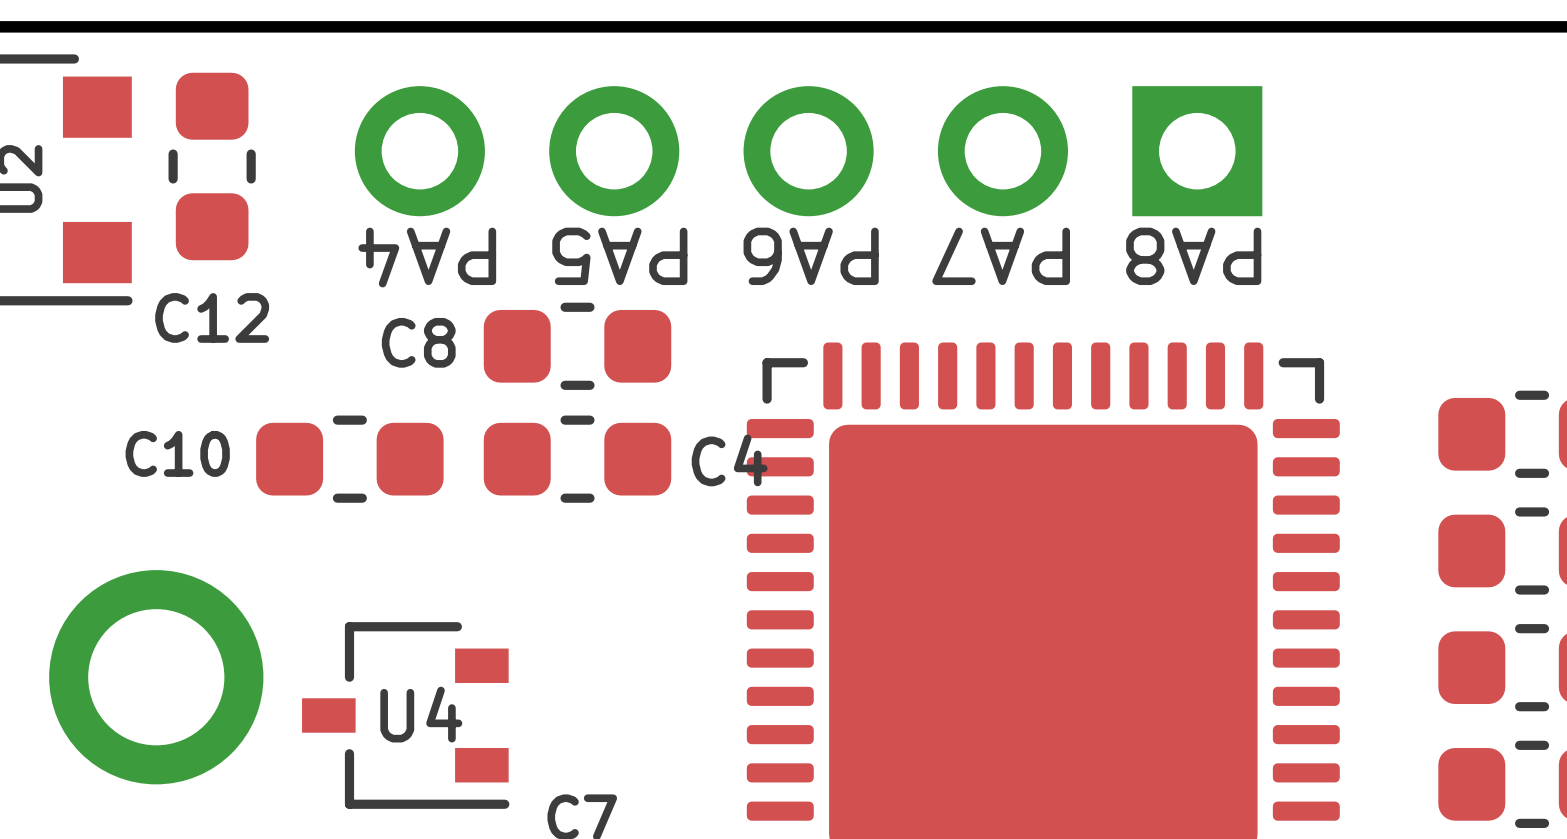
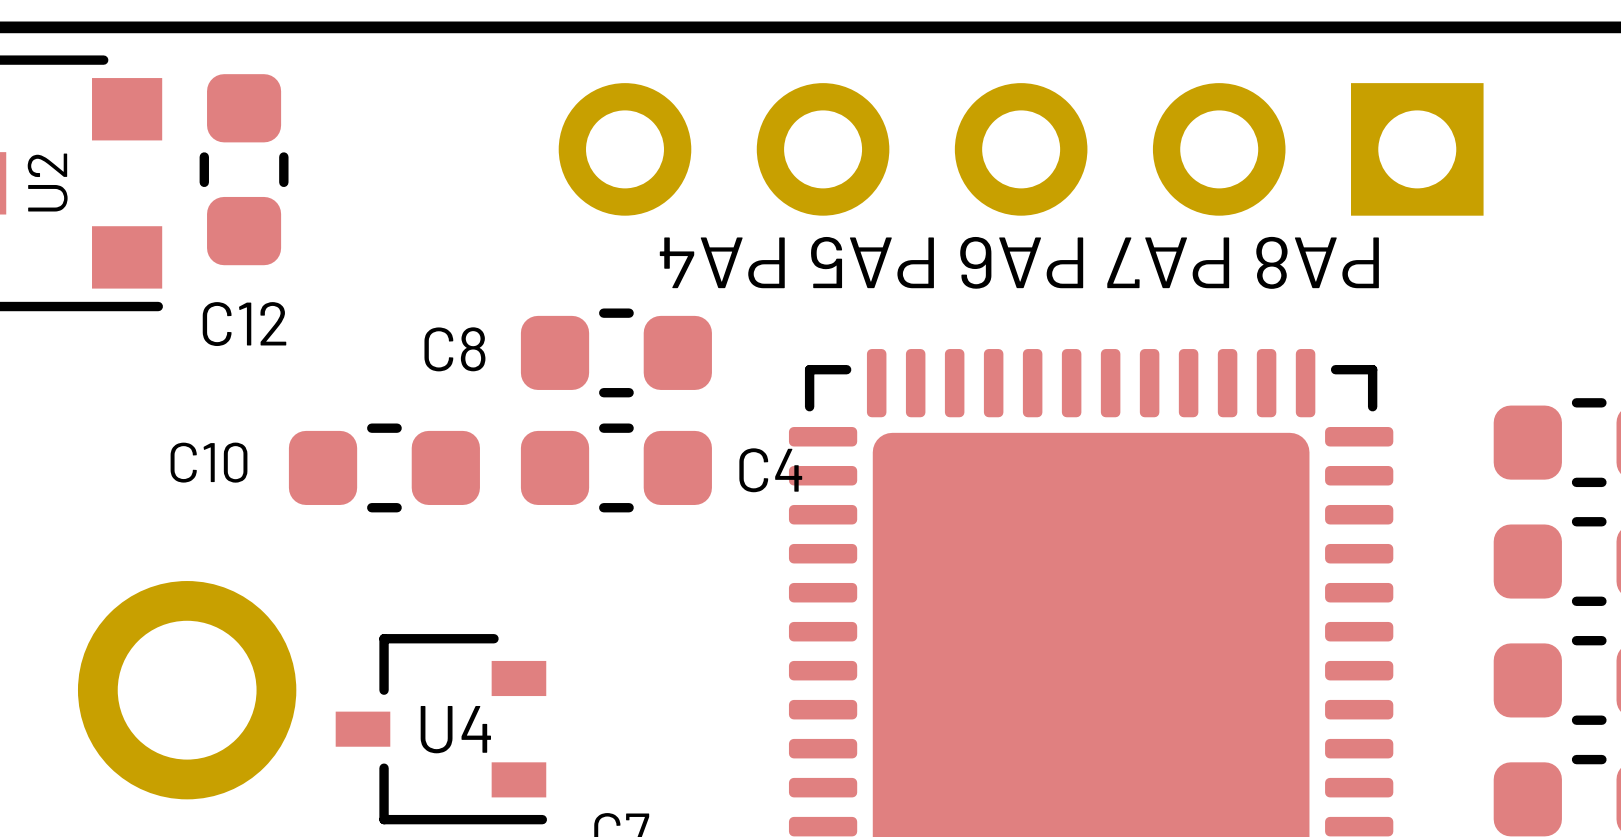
part position: (808, 151) -> (1021, 149)
text position: PA8 PA7 PA6 PA5 PA4 (809, 257) -> PA8 PA7 PA6 PA5 PA4 (1019, 262)

